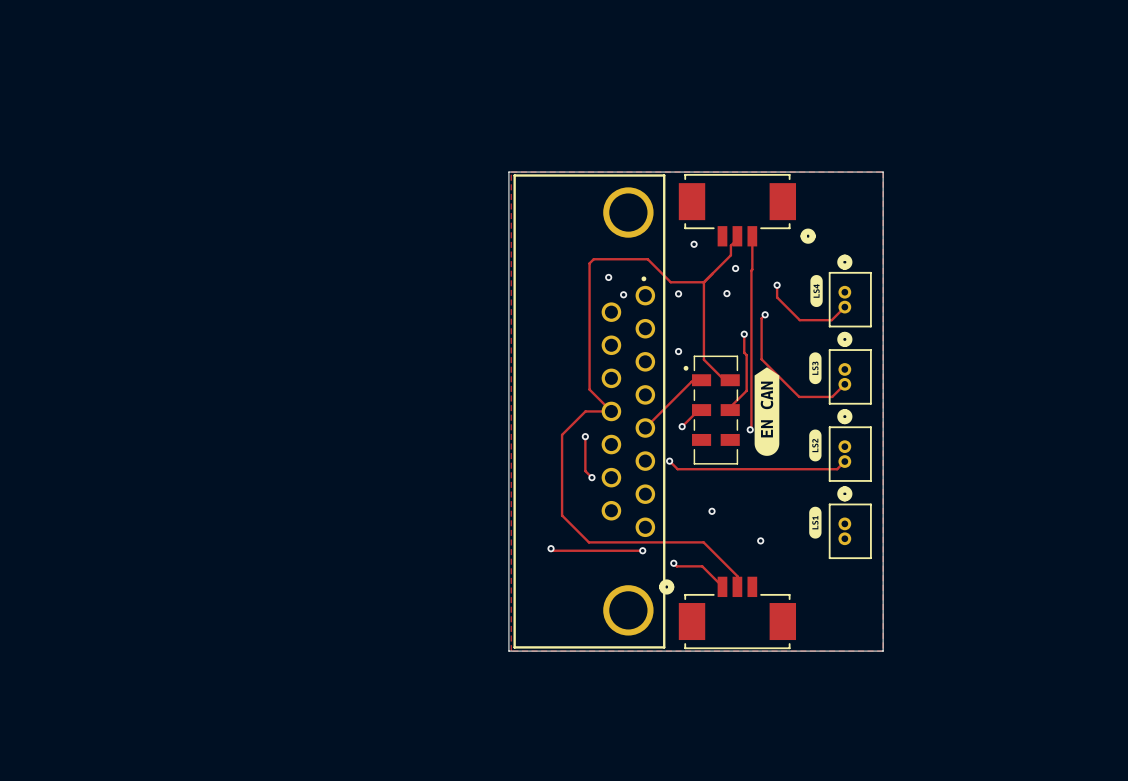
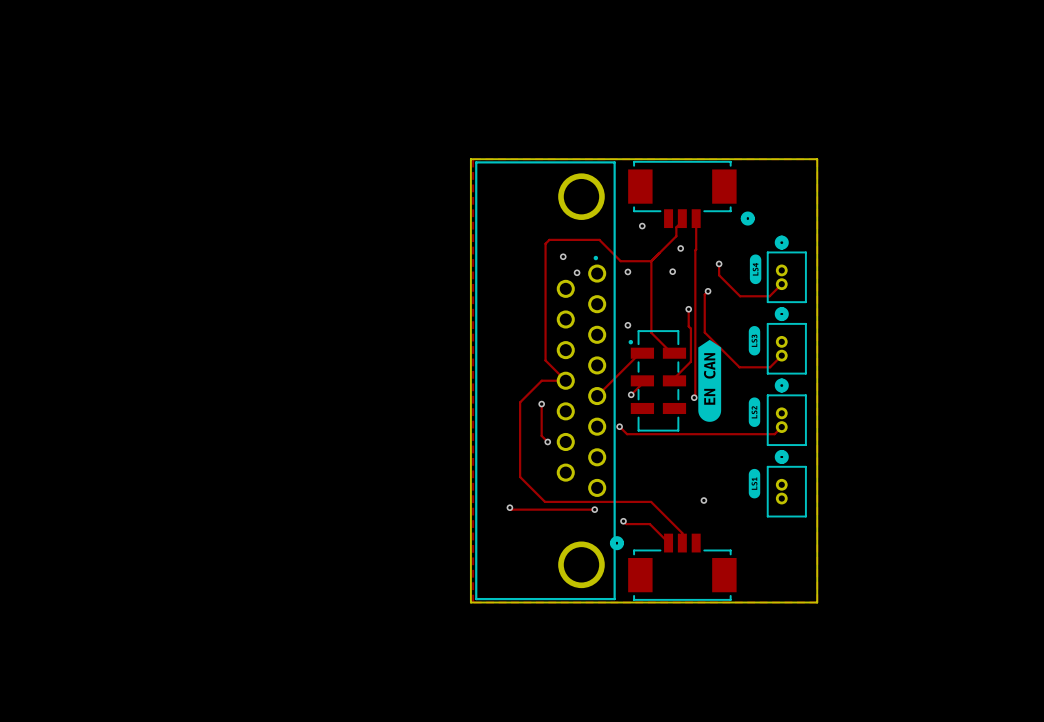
part footprint: [683, 355, 740, 465] -> [628, 330, 687, 432]
via: (712, 511) -> none

